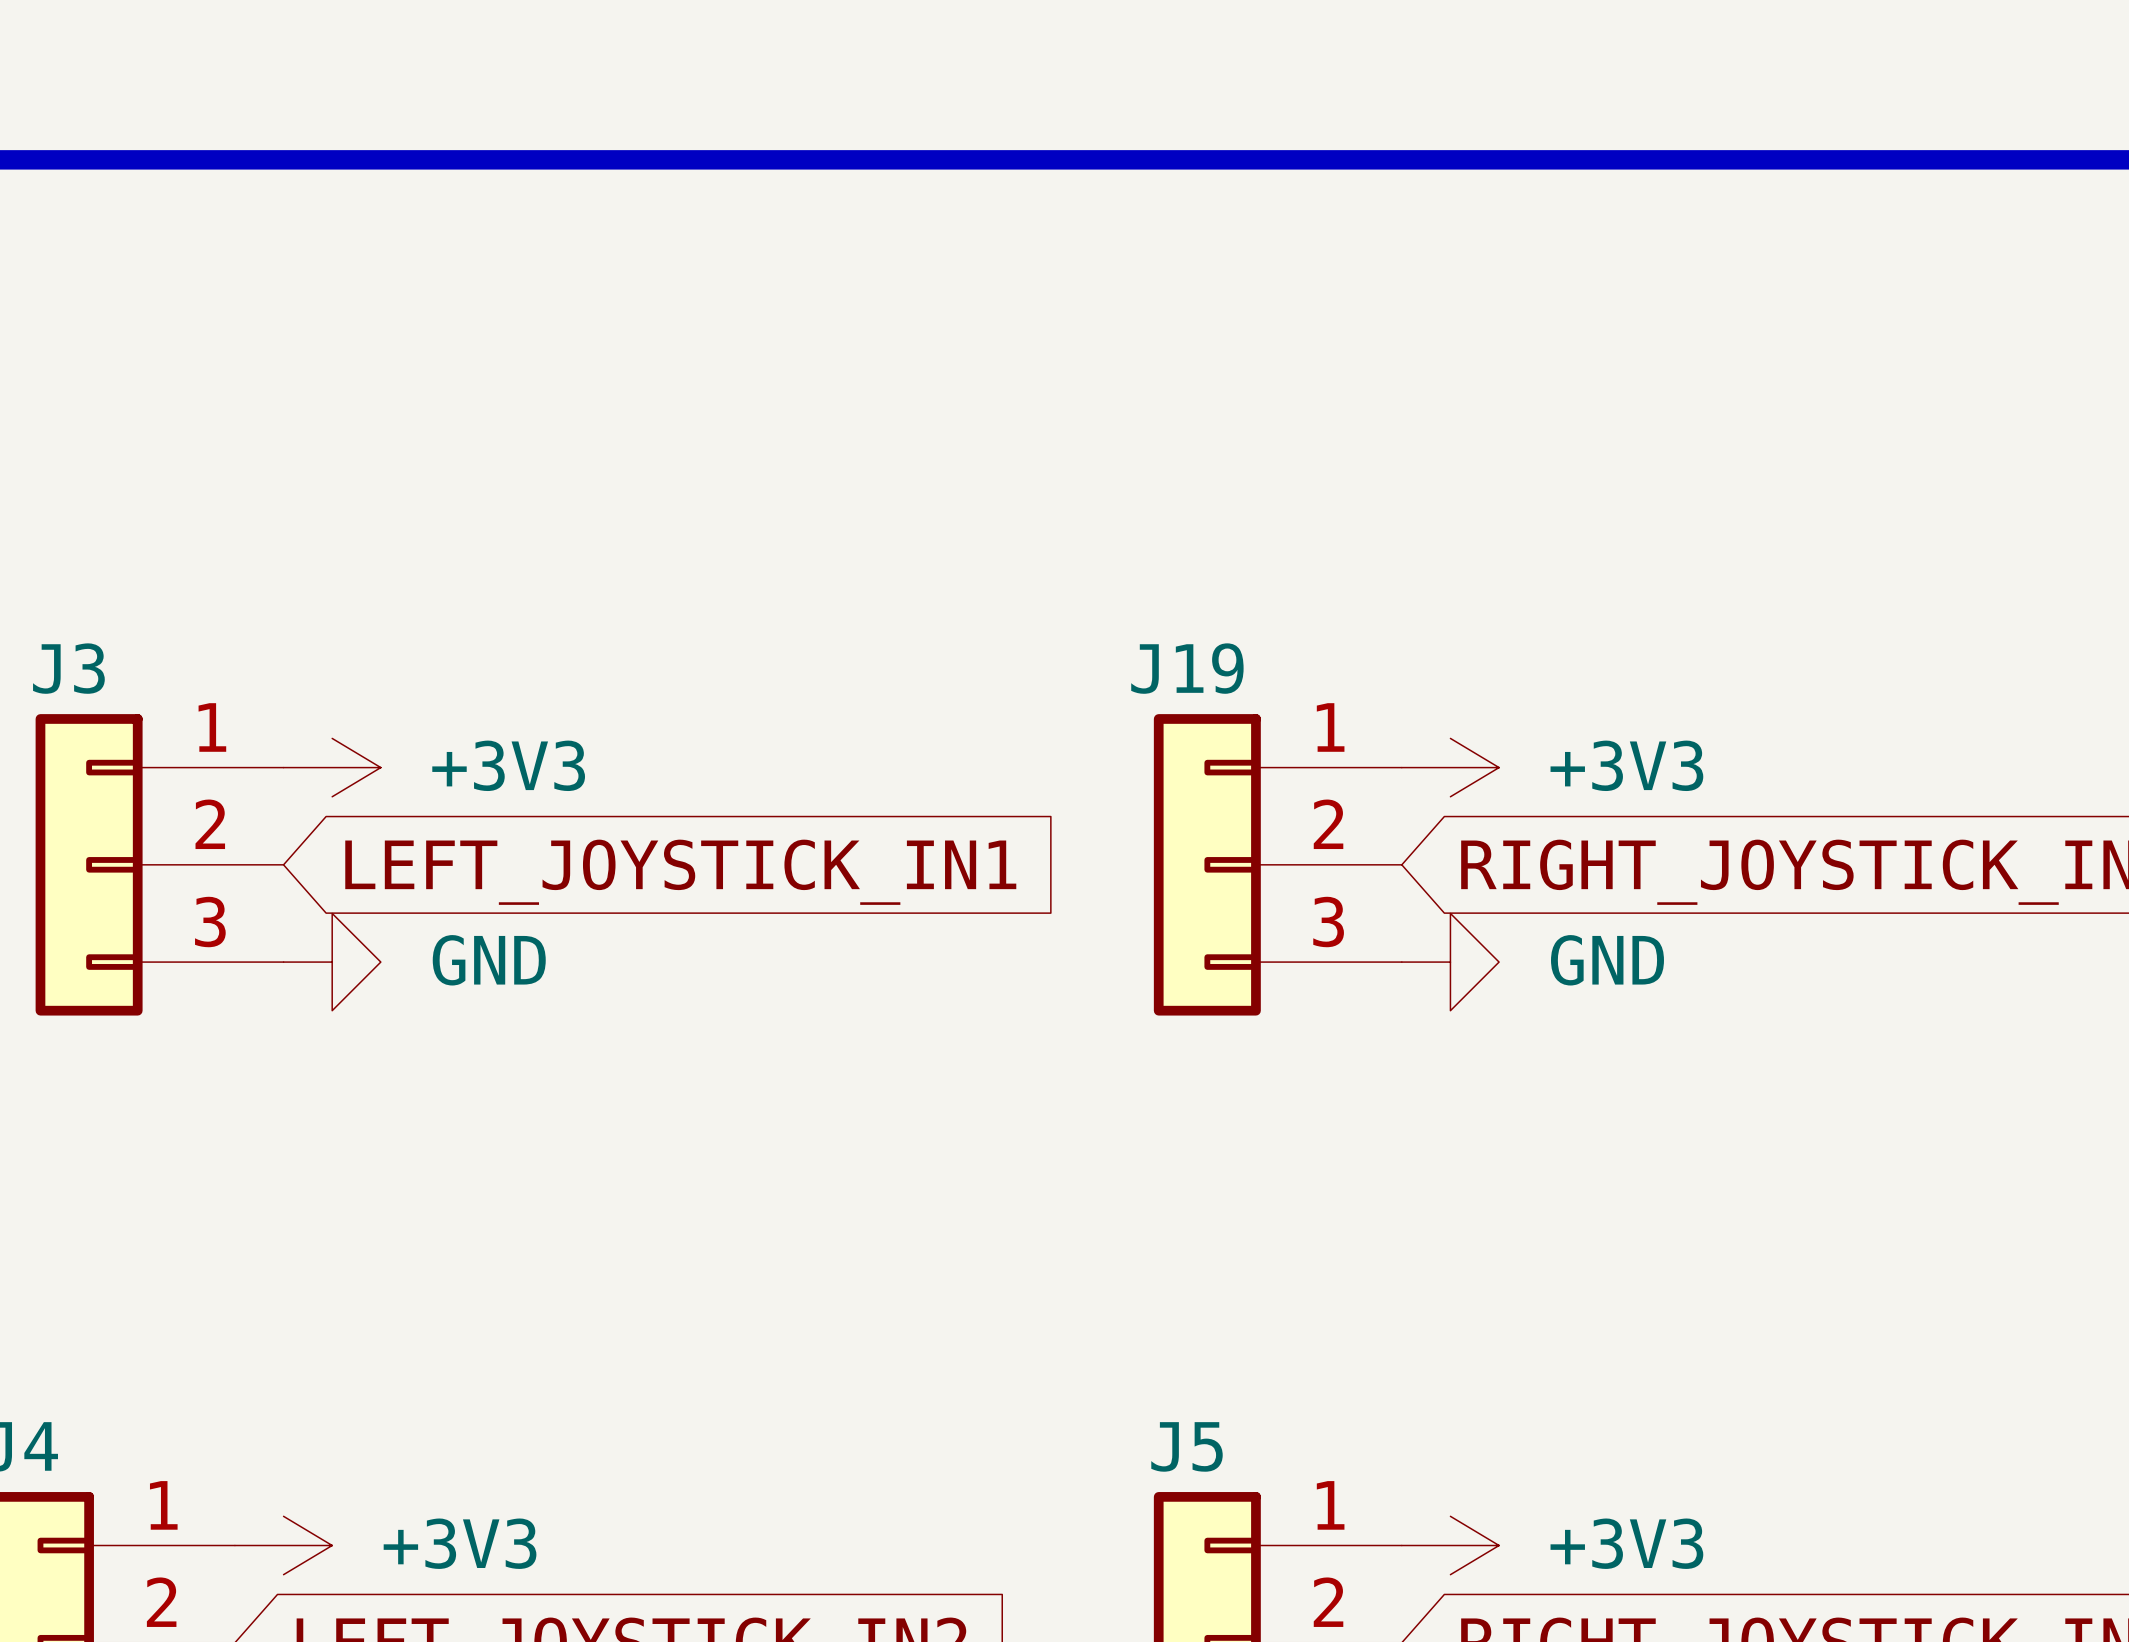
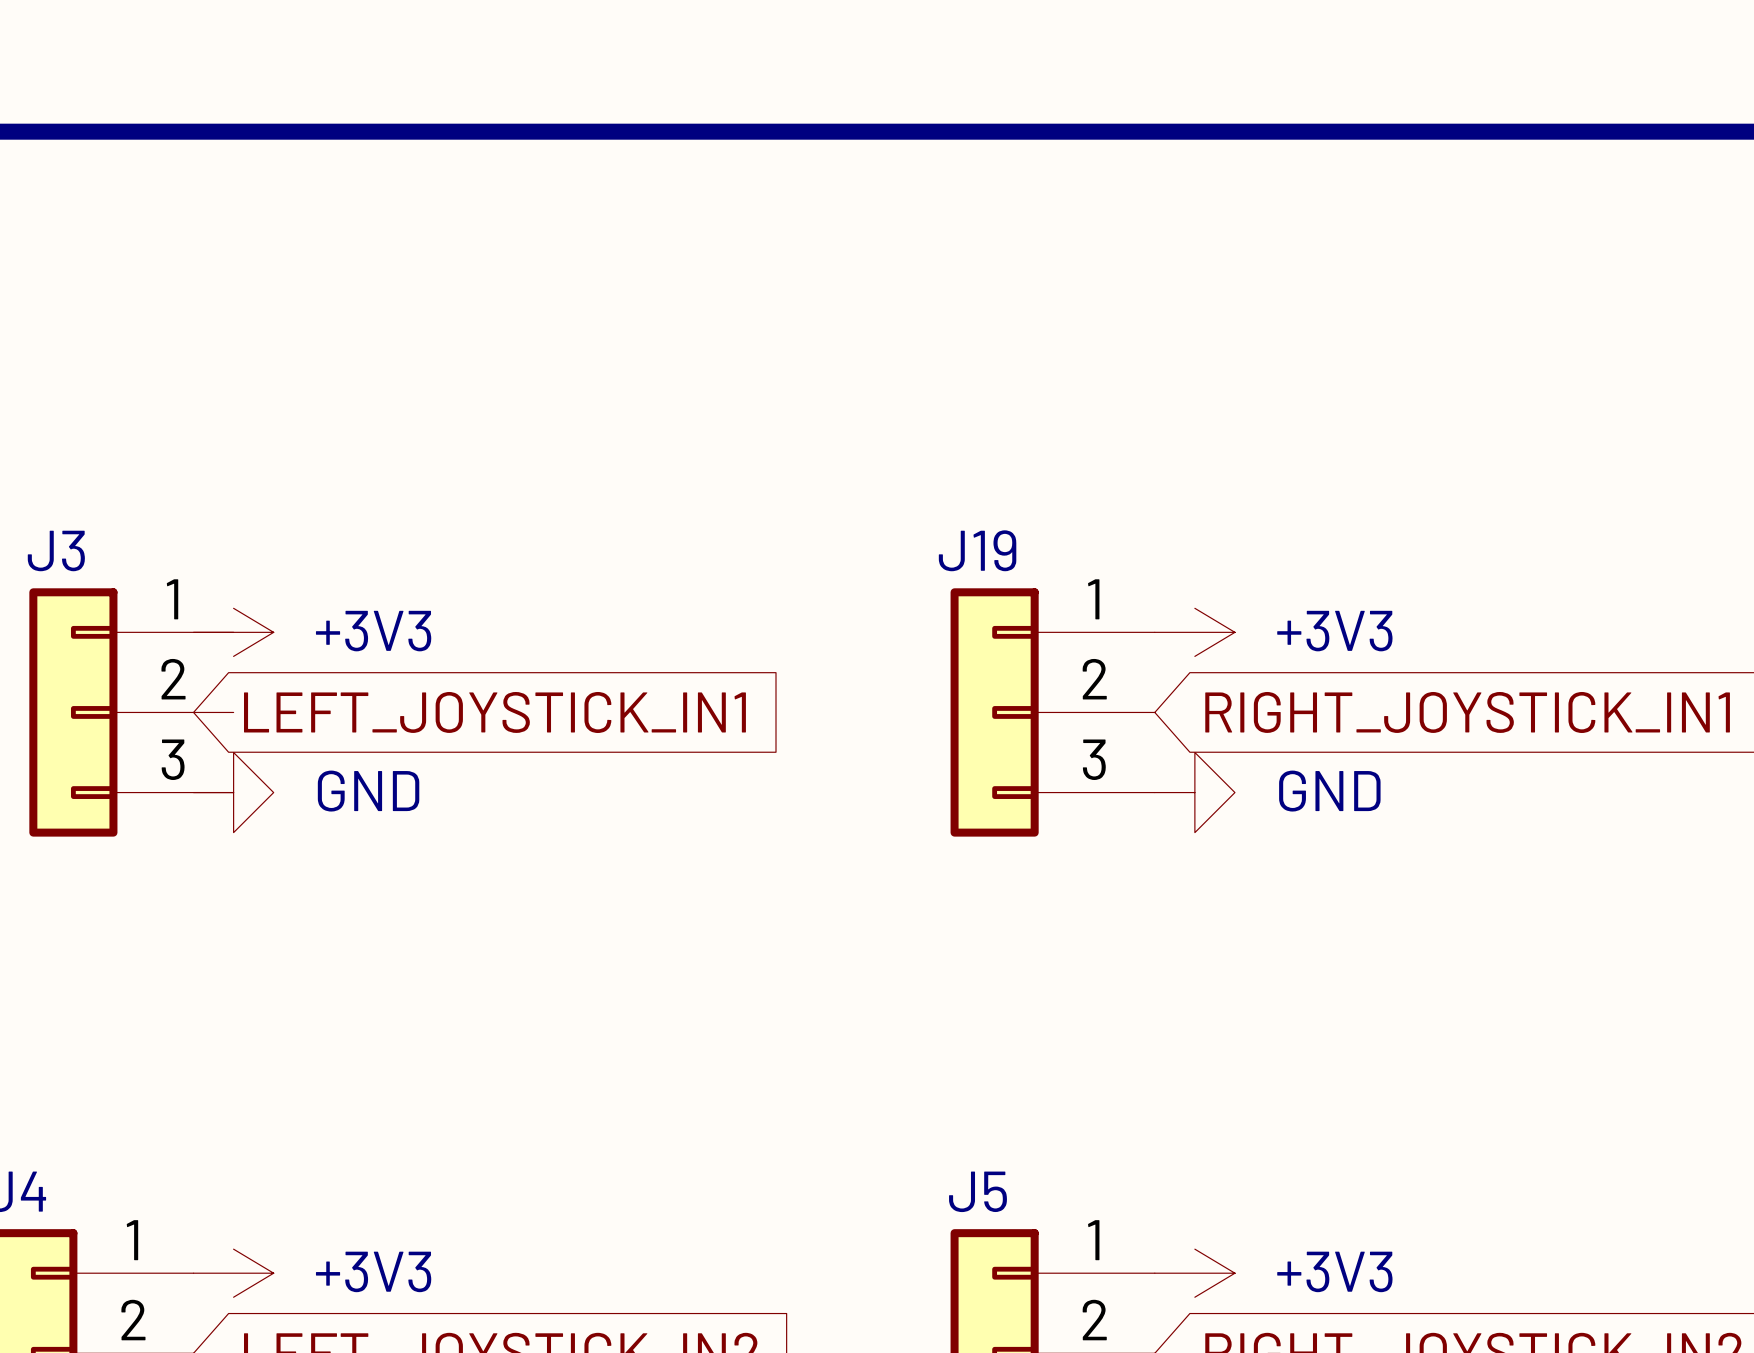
power symbol position: +3V3 (332, 767) -> +3V3 (233, 632)
global label position: LEFT_JOYSTICK_IN1 (680, 872) -> LEFT_JOYSTICK_IN1 (494, 712)
power symbol position: GND (332, 962) -> GND (233, 792)

